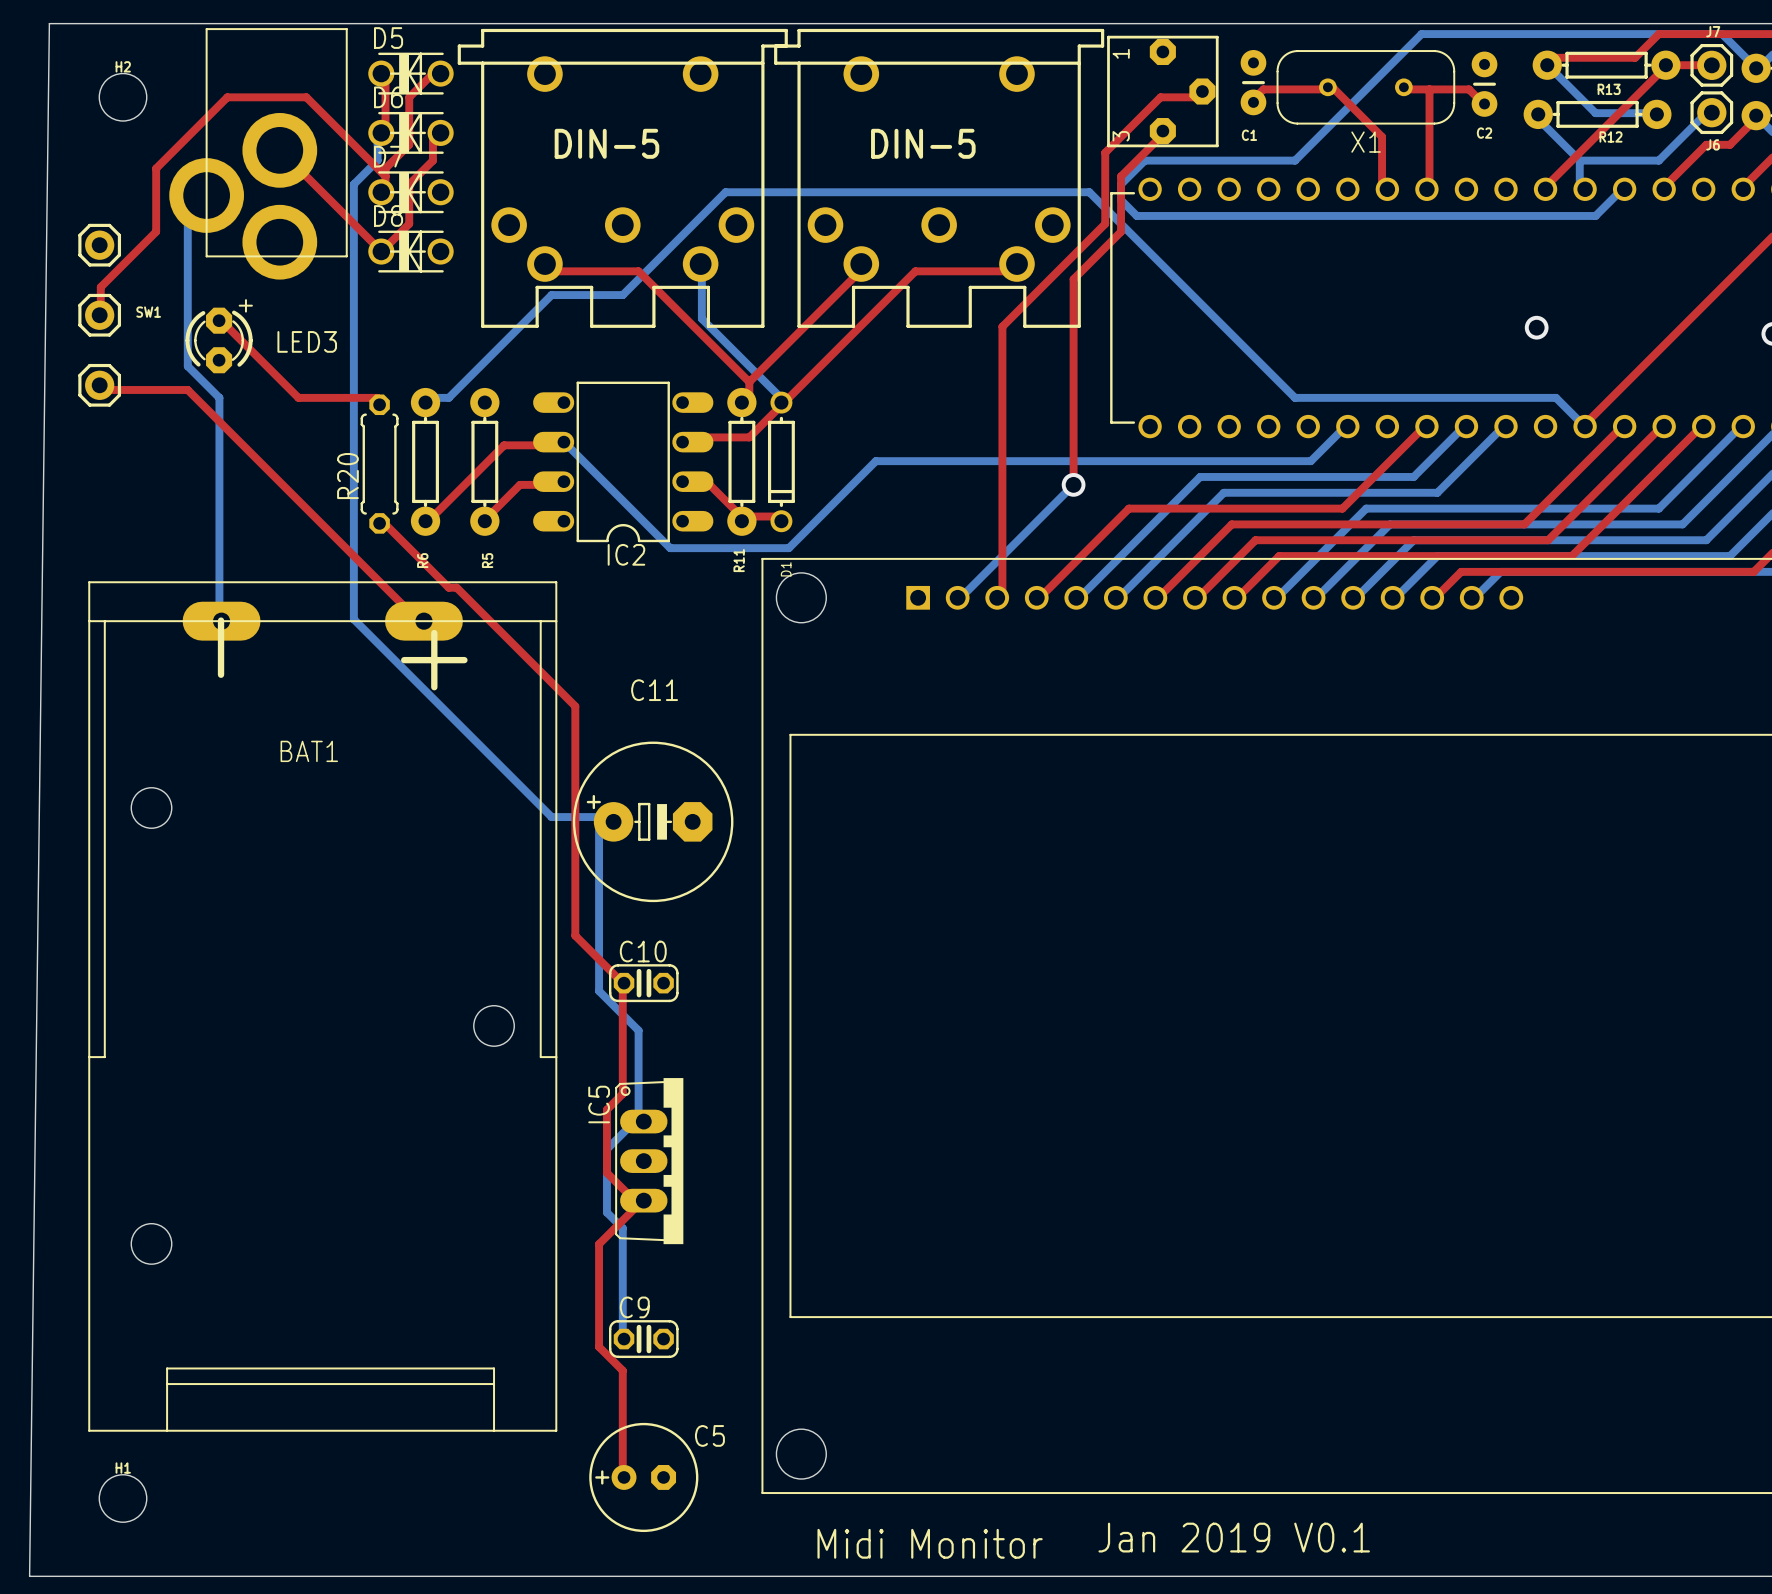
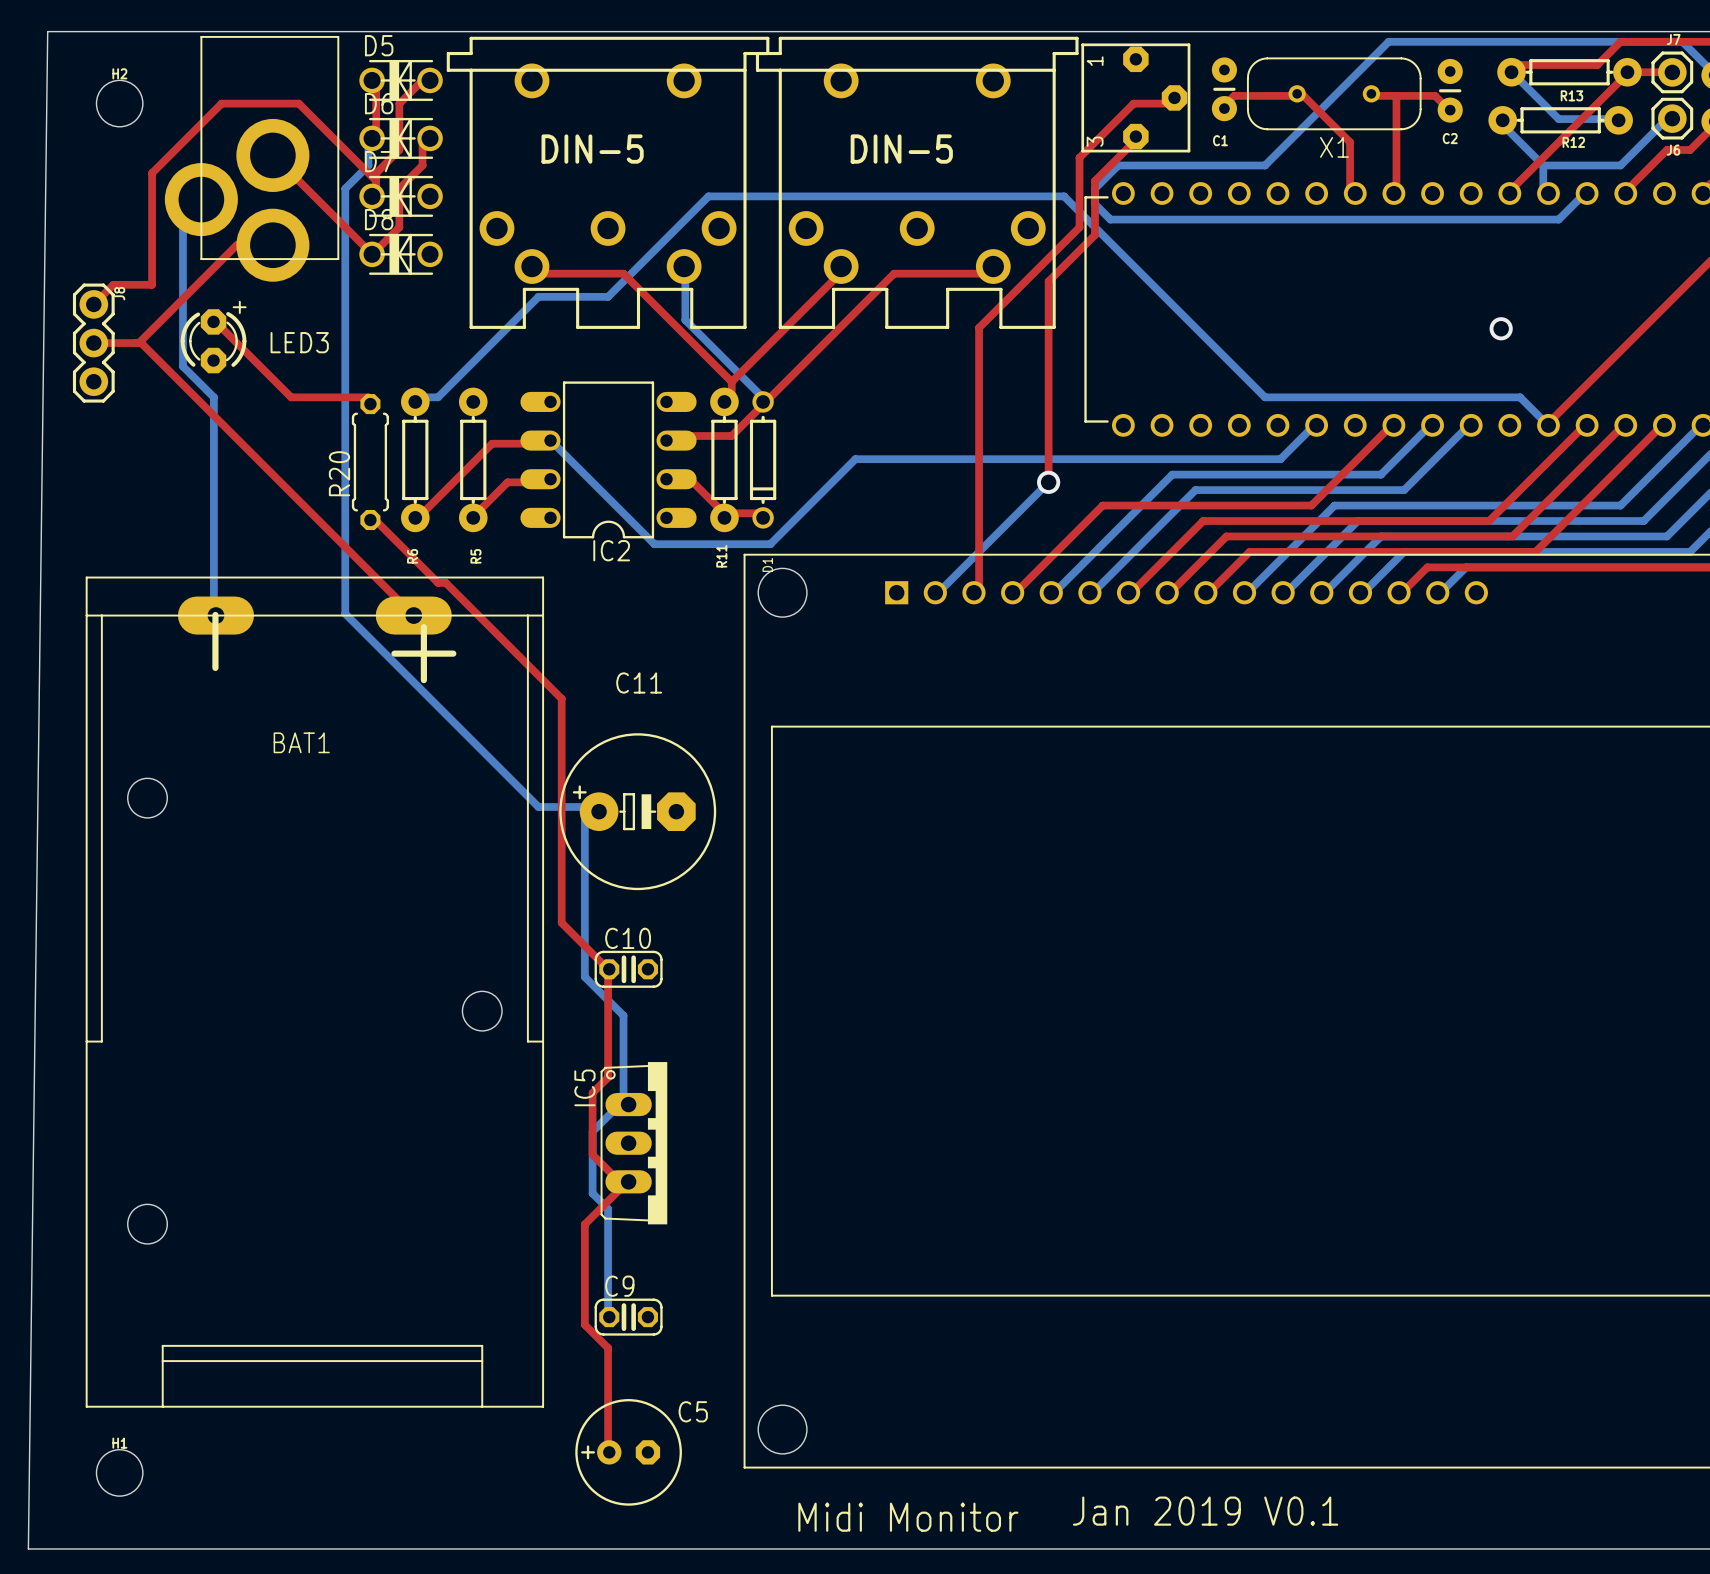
top track: (156, 231) (100, 287) (99, 315) -> (152, 235) (152, 284) (113, 284) (93, 304)
top track: none -> (272, 245) (236, 245) (138, 343)
part: (99, 245) -> none
SW1: (99, 315) -> none
J8: none -> (93, 343)
top track: (99, 385) (100, 389) (187, 389) (417, 619) (423, 621) -> (93, 343) (141, 343) (413, 615)
part: (99, 385) -> none

